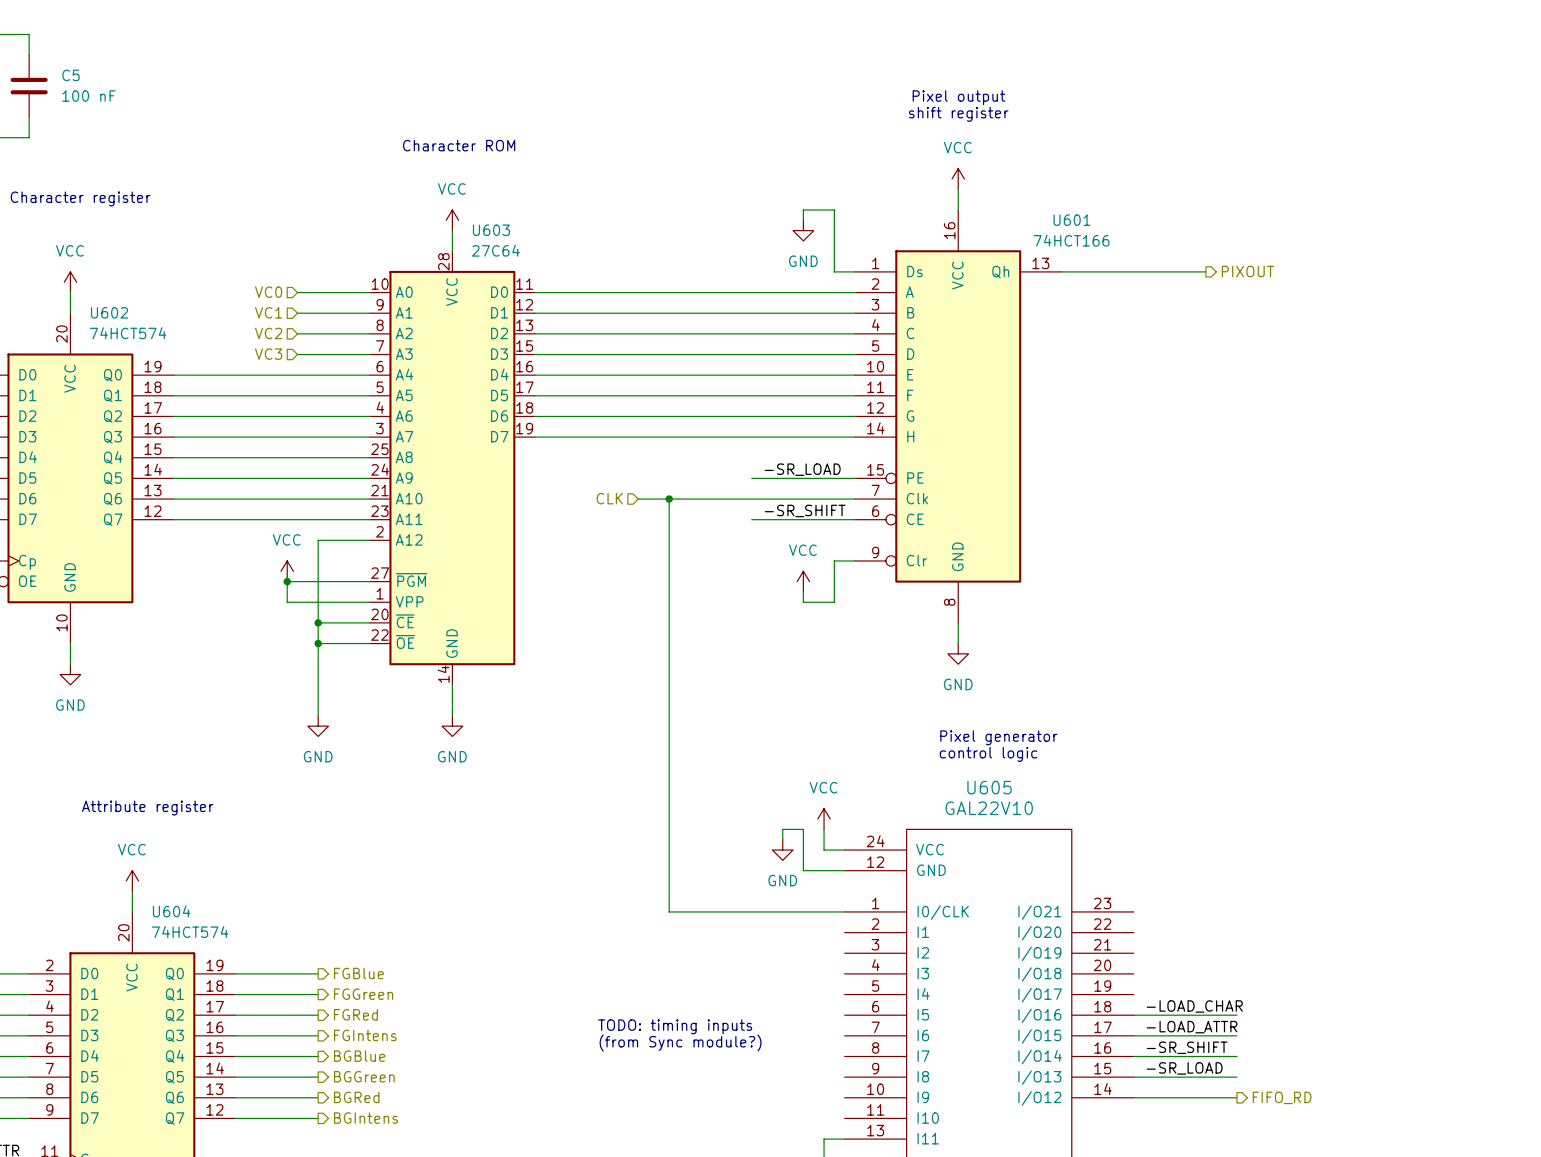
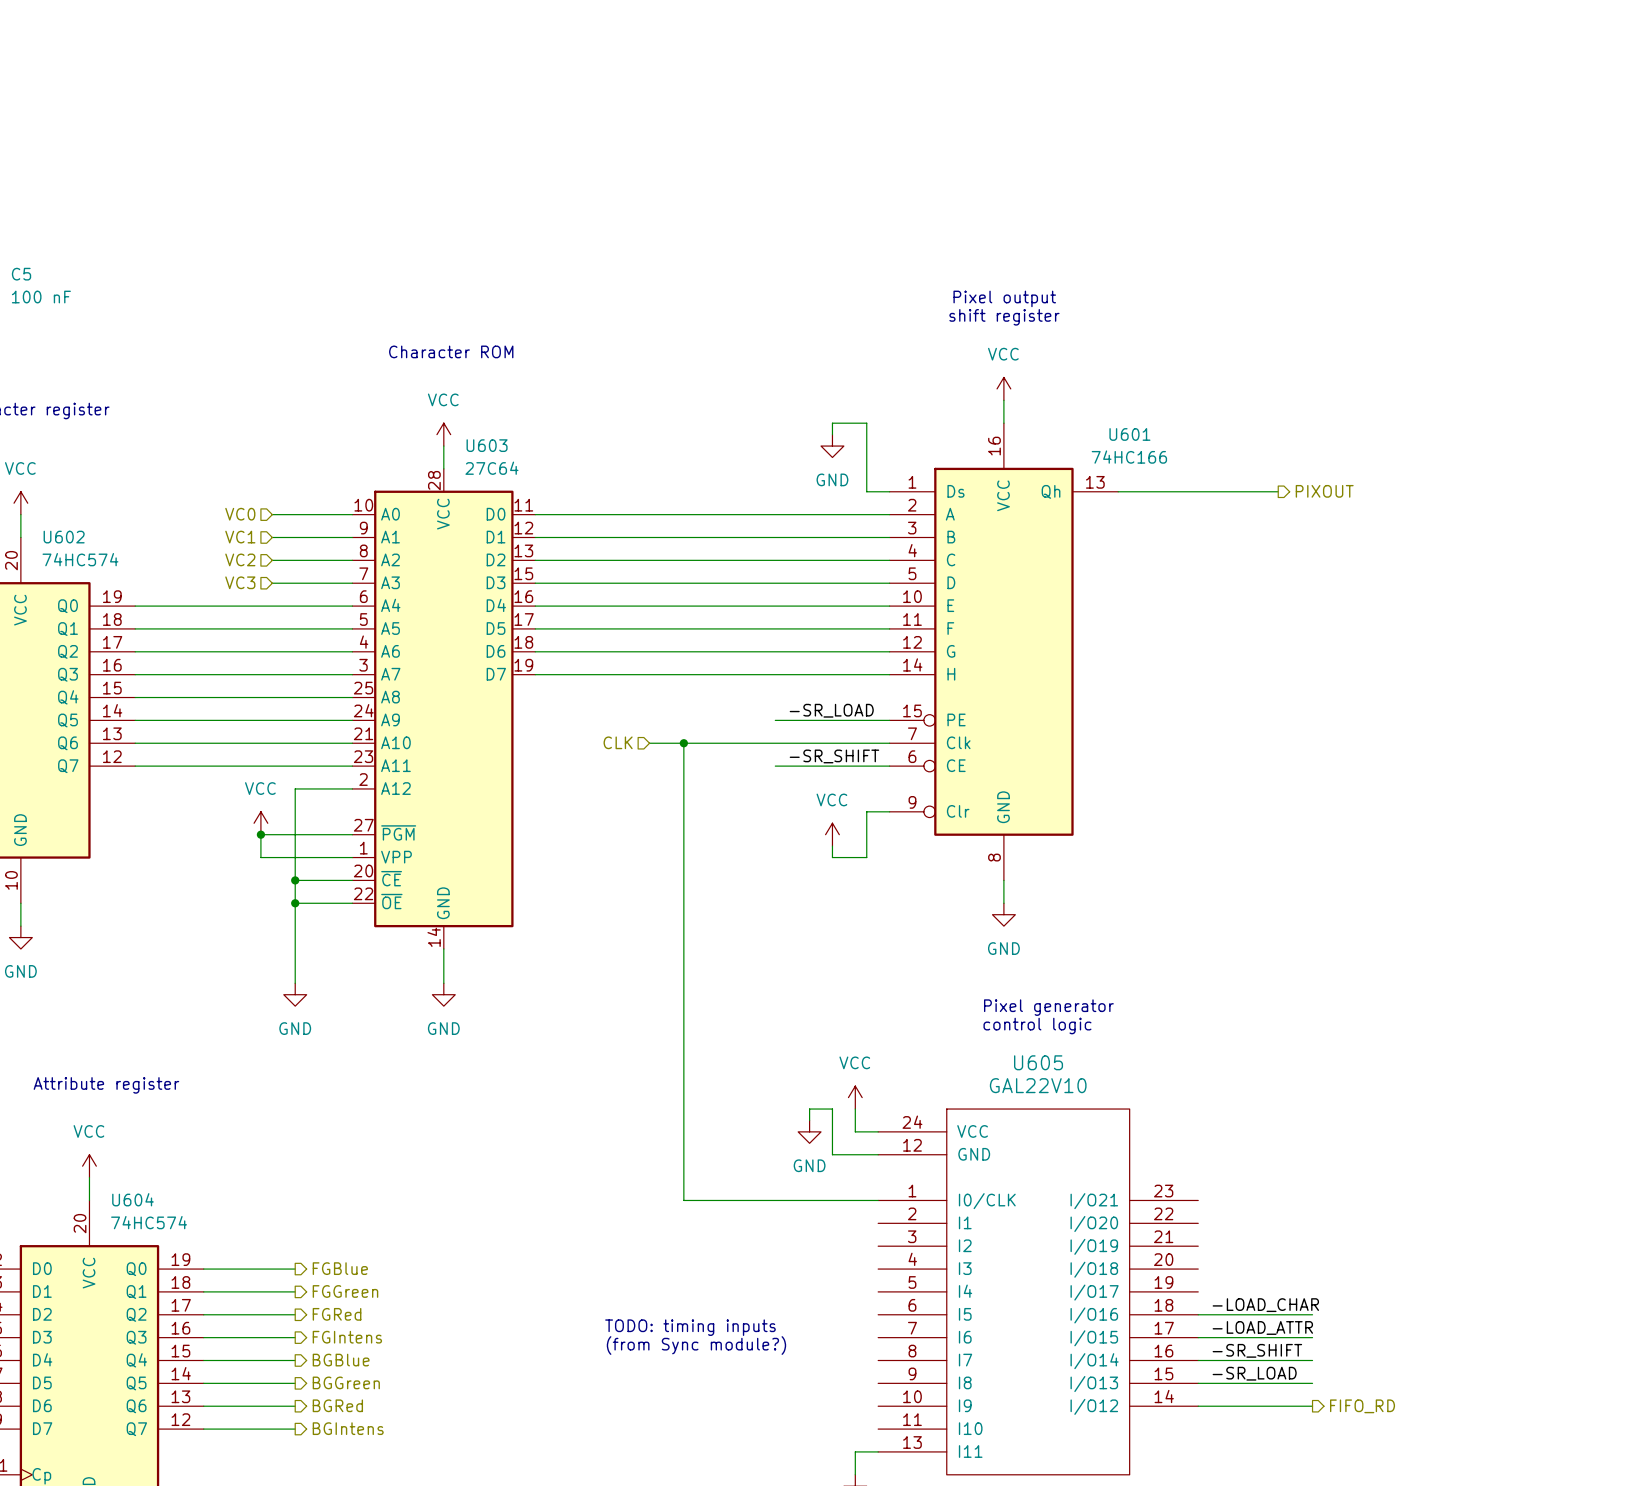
U601 value: 74HCT166 (1071, 240) -> 74HC166 (1129, 457)
U602 value: 74HCT574 (128, 333) -> 74HC574 (80, 559)
U604 value: 74HCT574 (190, 931) -> 74HC574 (149, 1222)

